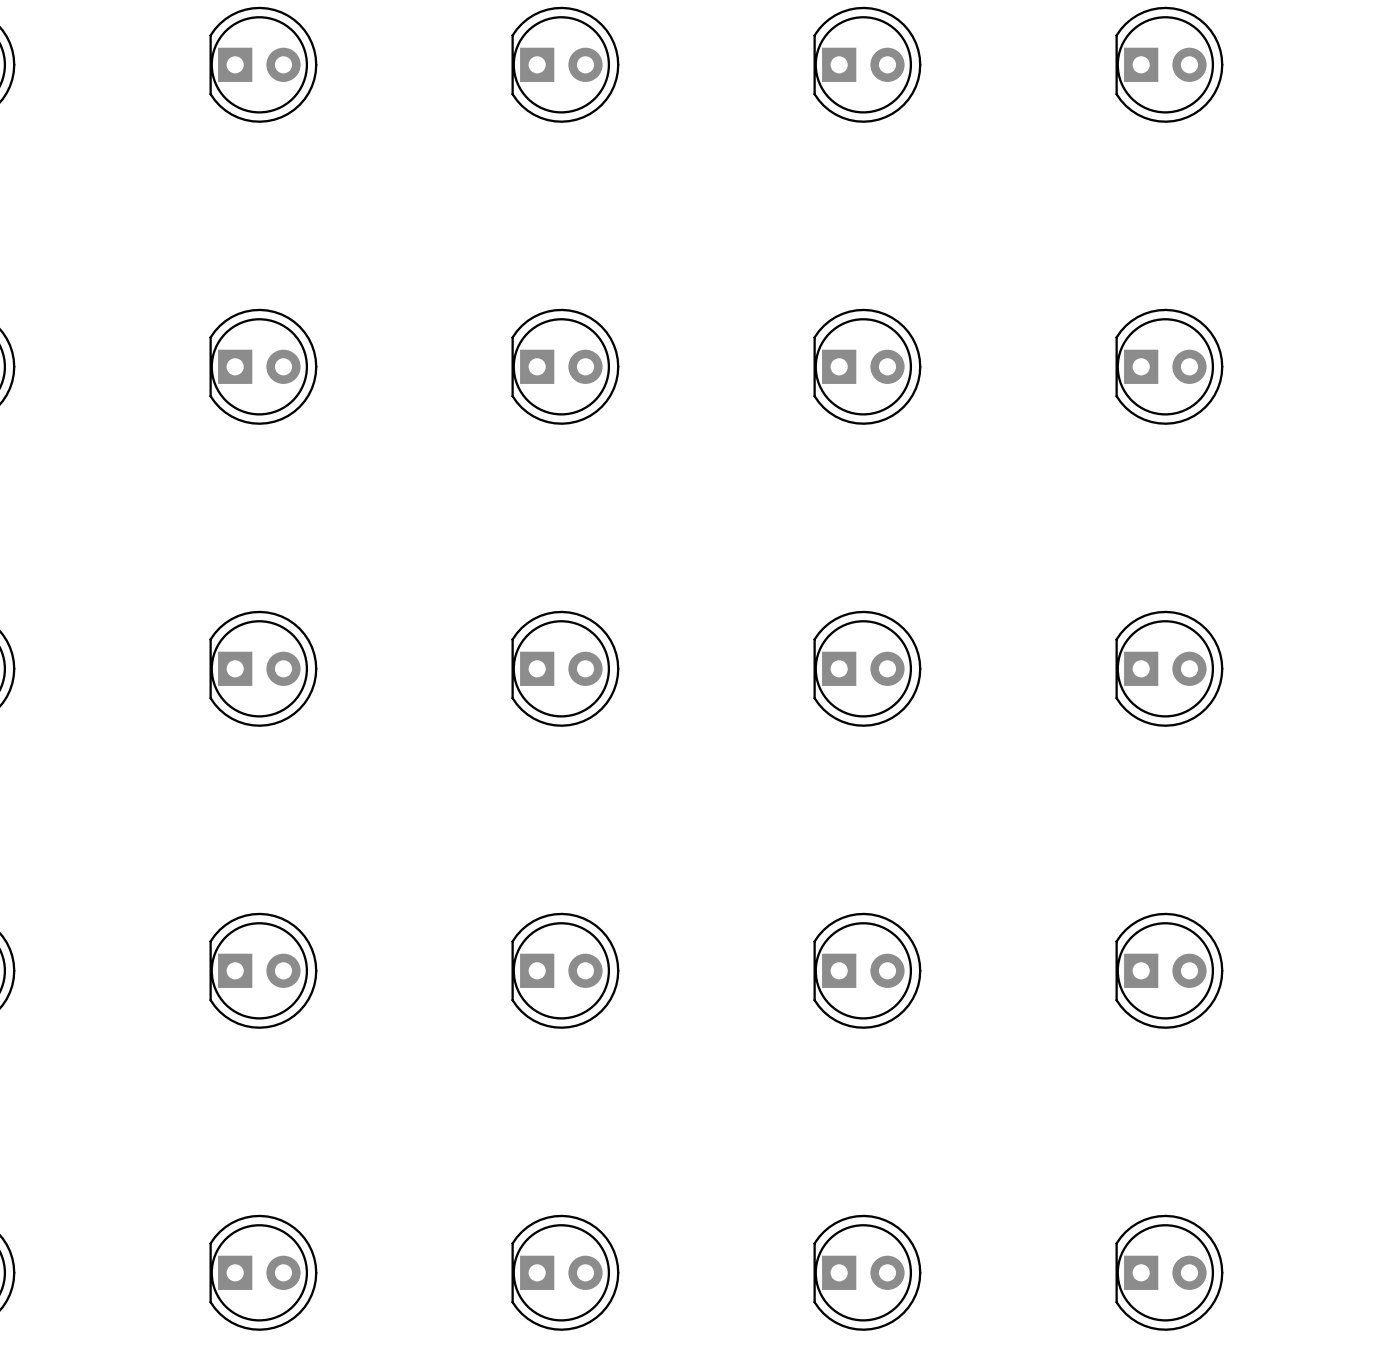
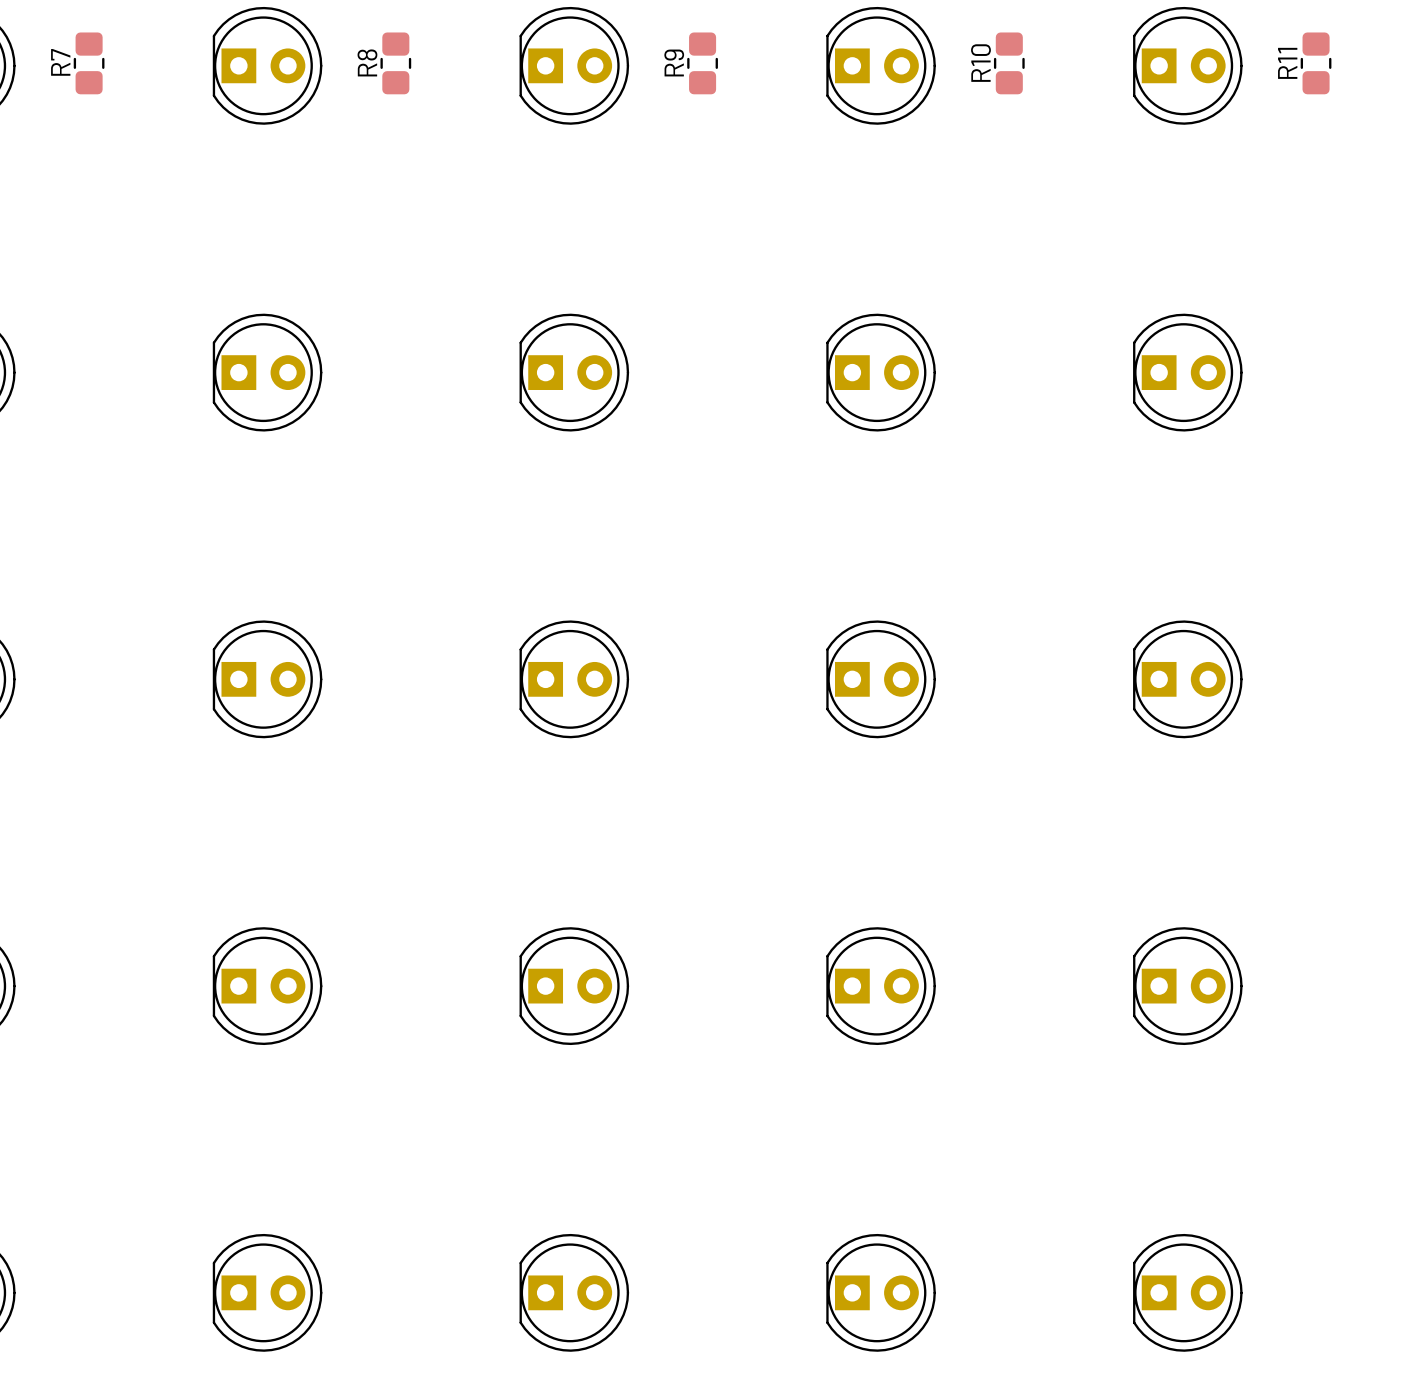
R7: none -> (89, 63)
R8: none -> (395, 63)
R9: none -> (702, 63)
R10: none -> (1009, 63)
R11: none -> (1316, 63)

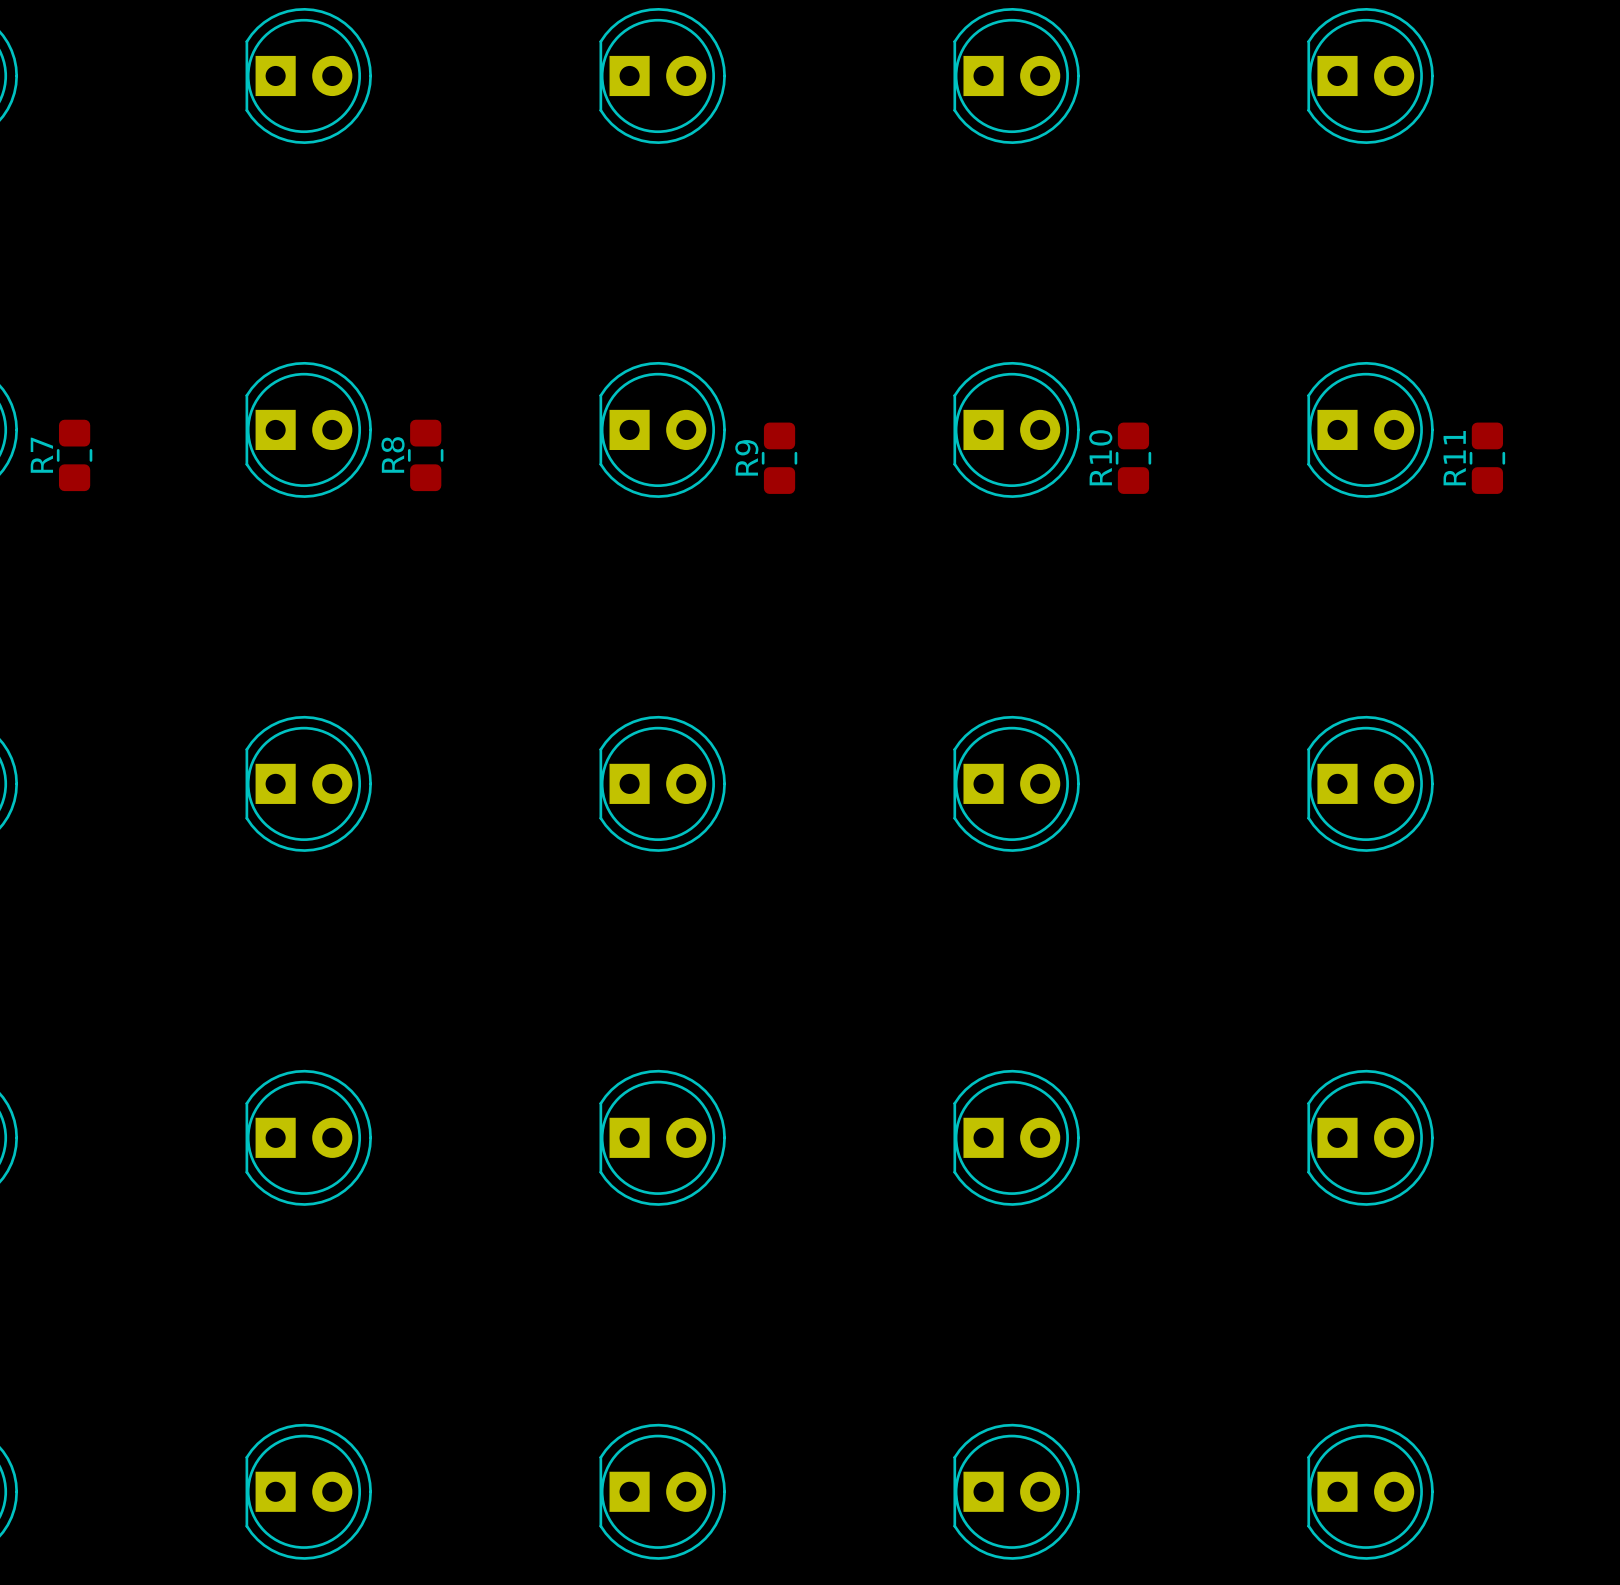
R7 position: (89, 63) -> (74, 455)
R8 position: (395, 63) -> (425, 455)
R9 position: (702, 63) -> (779, 458)
R10 position: (1009, 63) -> (1133, 458)
R11 position: (1316, 63) -> (1487, 458)

